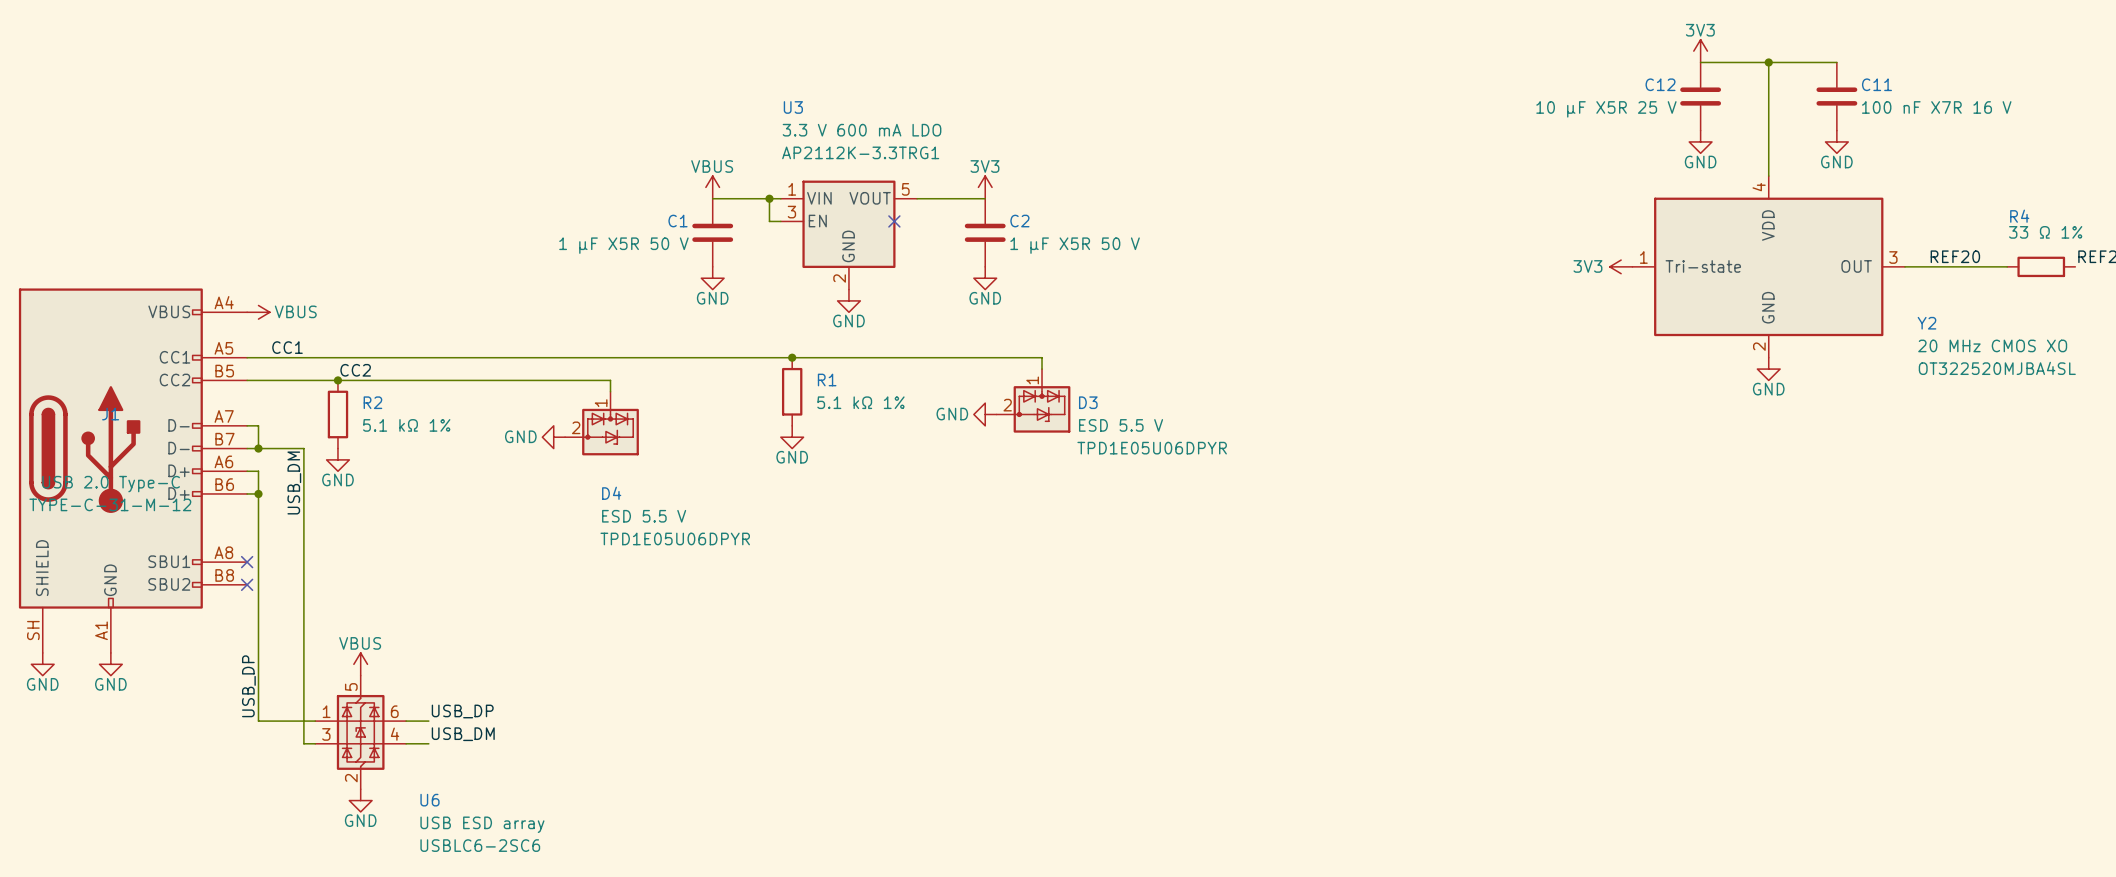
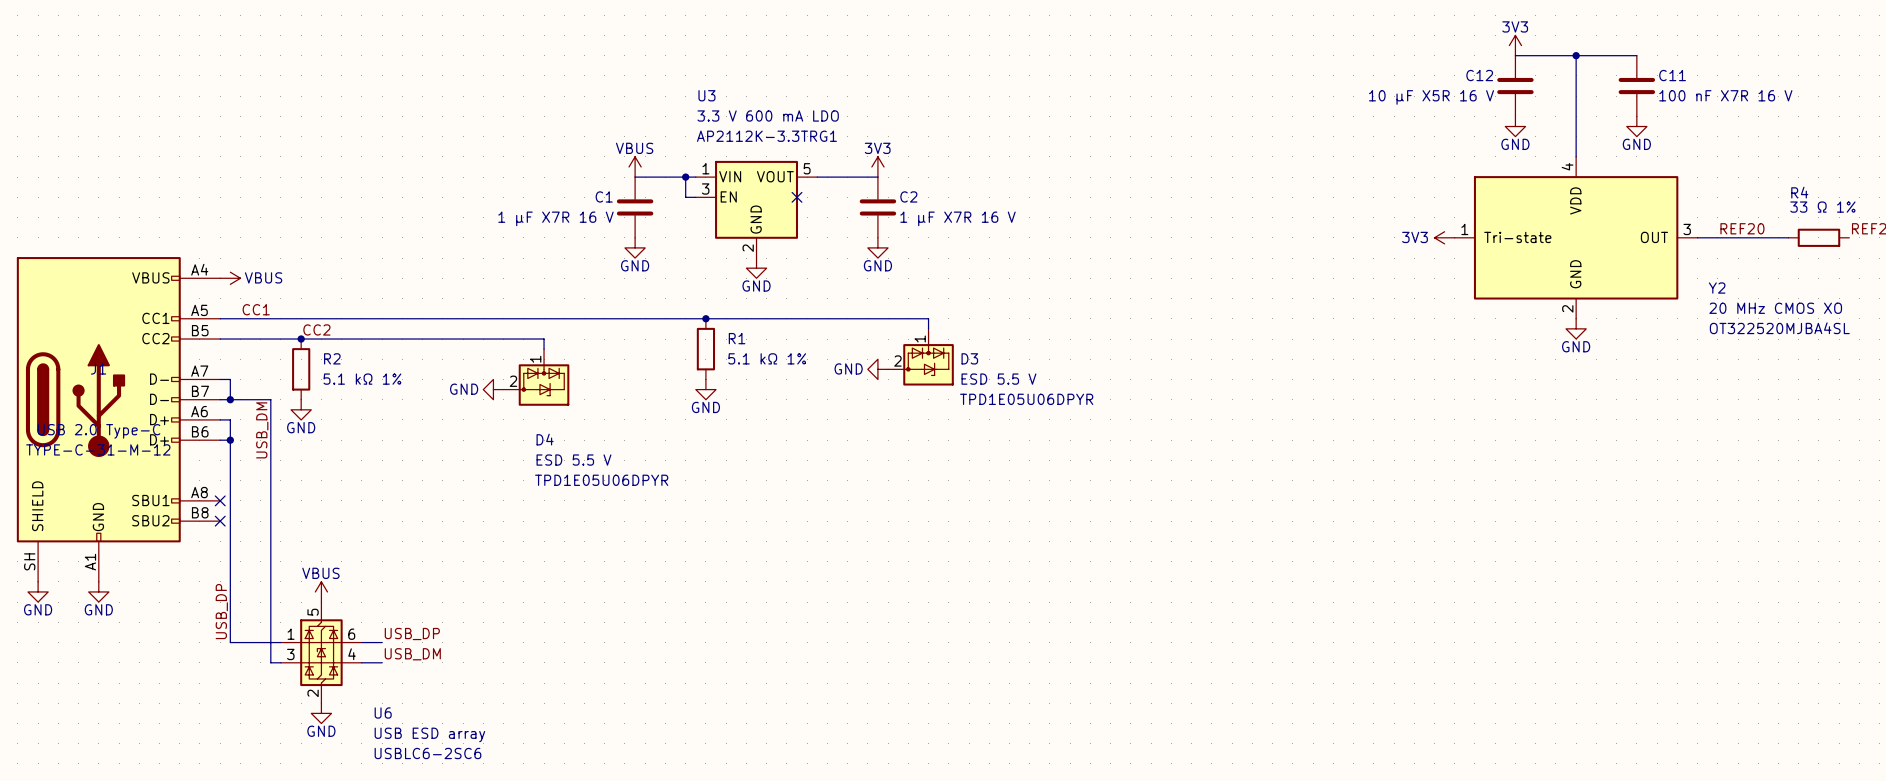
C12 value: 10 µF X5R 25 V (1606, 109) -> 10 µF X5R 16 V (1431, 97)
C1 value: 1 µF X5R 50 V (623, 245) -> 1 µF X7R 16 V (555, 218)
C2 value: 1 µF X5R 50 V (1075, 245) -> 1 µF X7R 16 V (958, 218)

